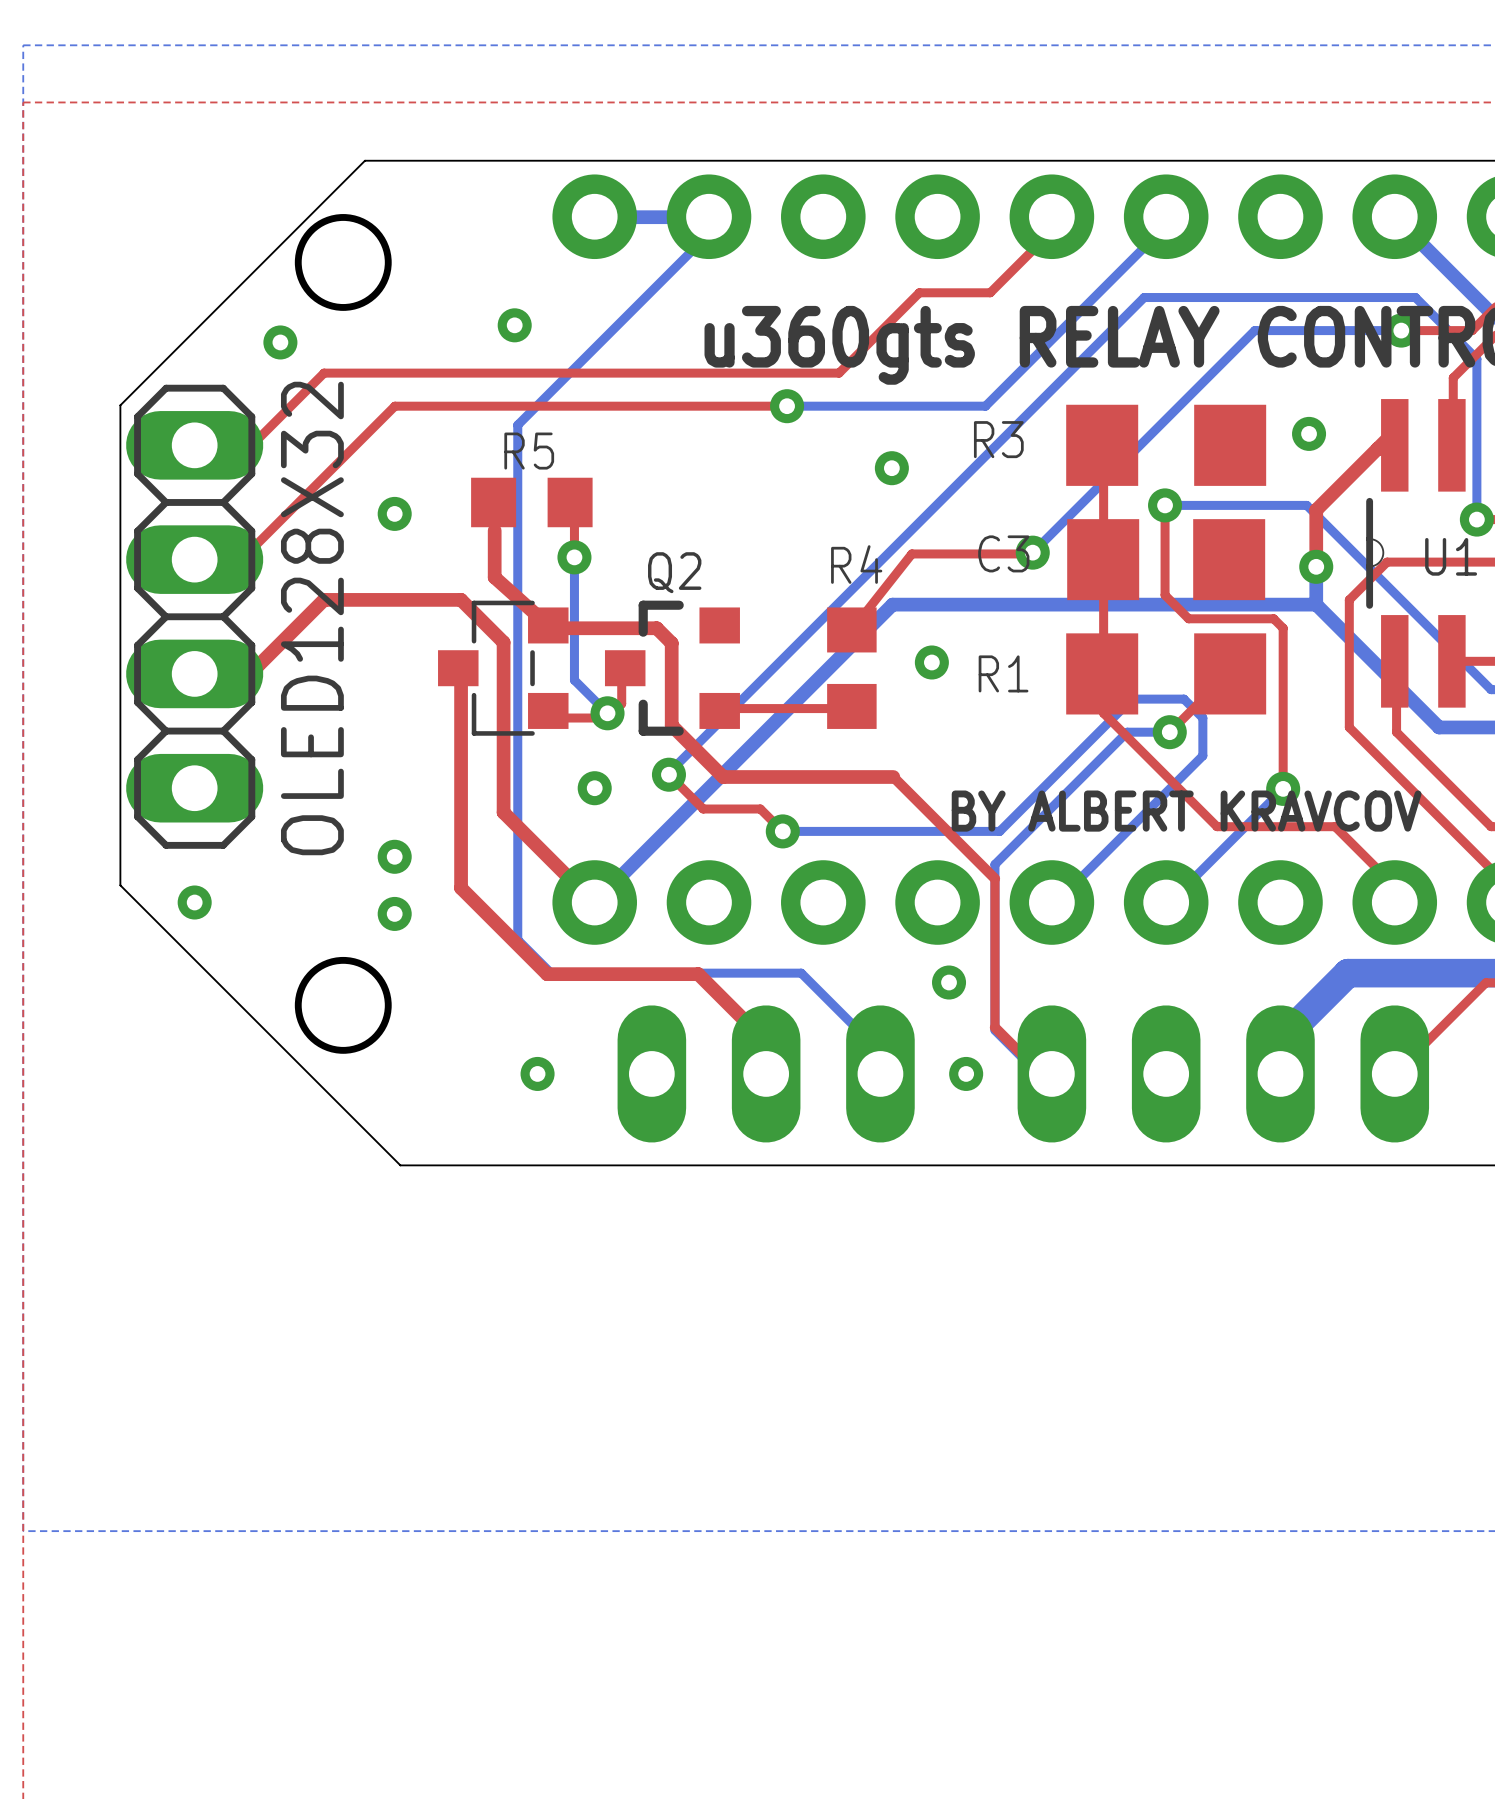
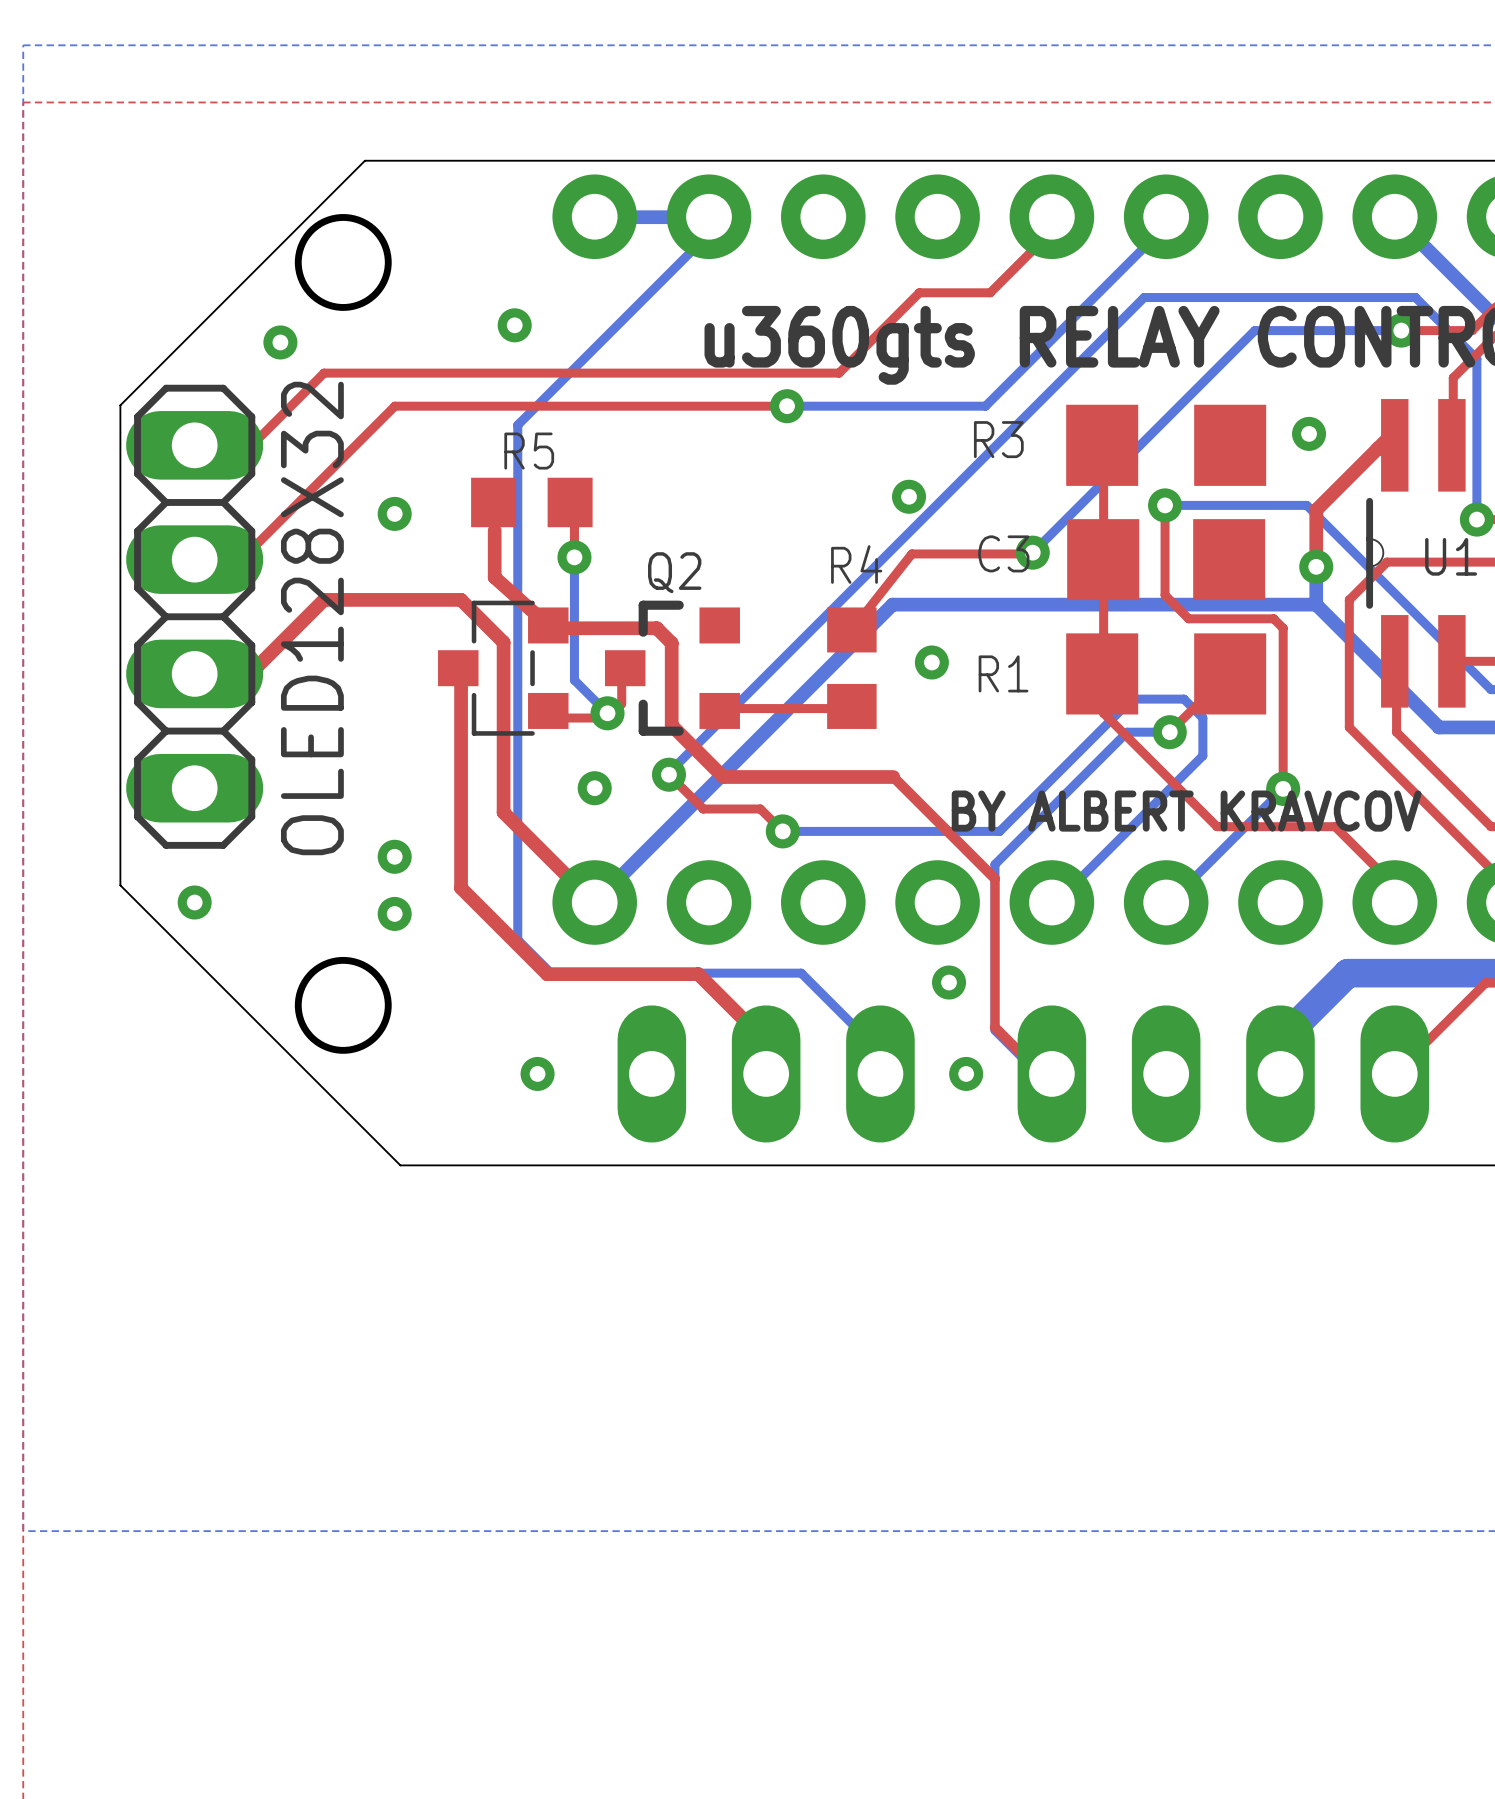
via position: (891, 468) -> (909, 496)

